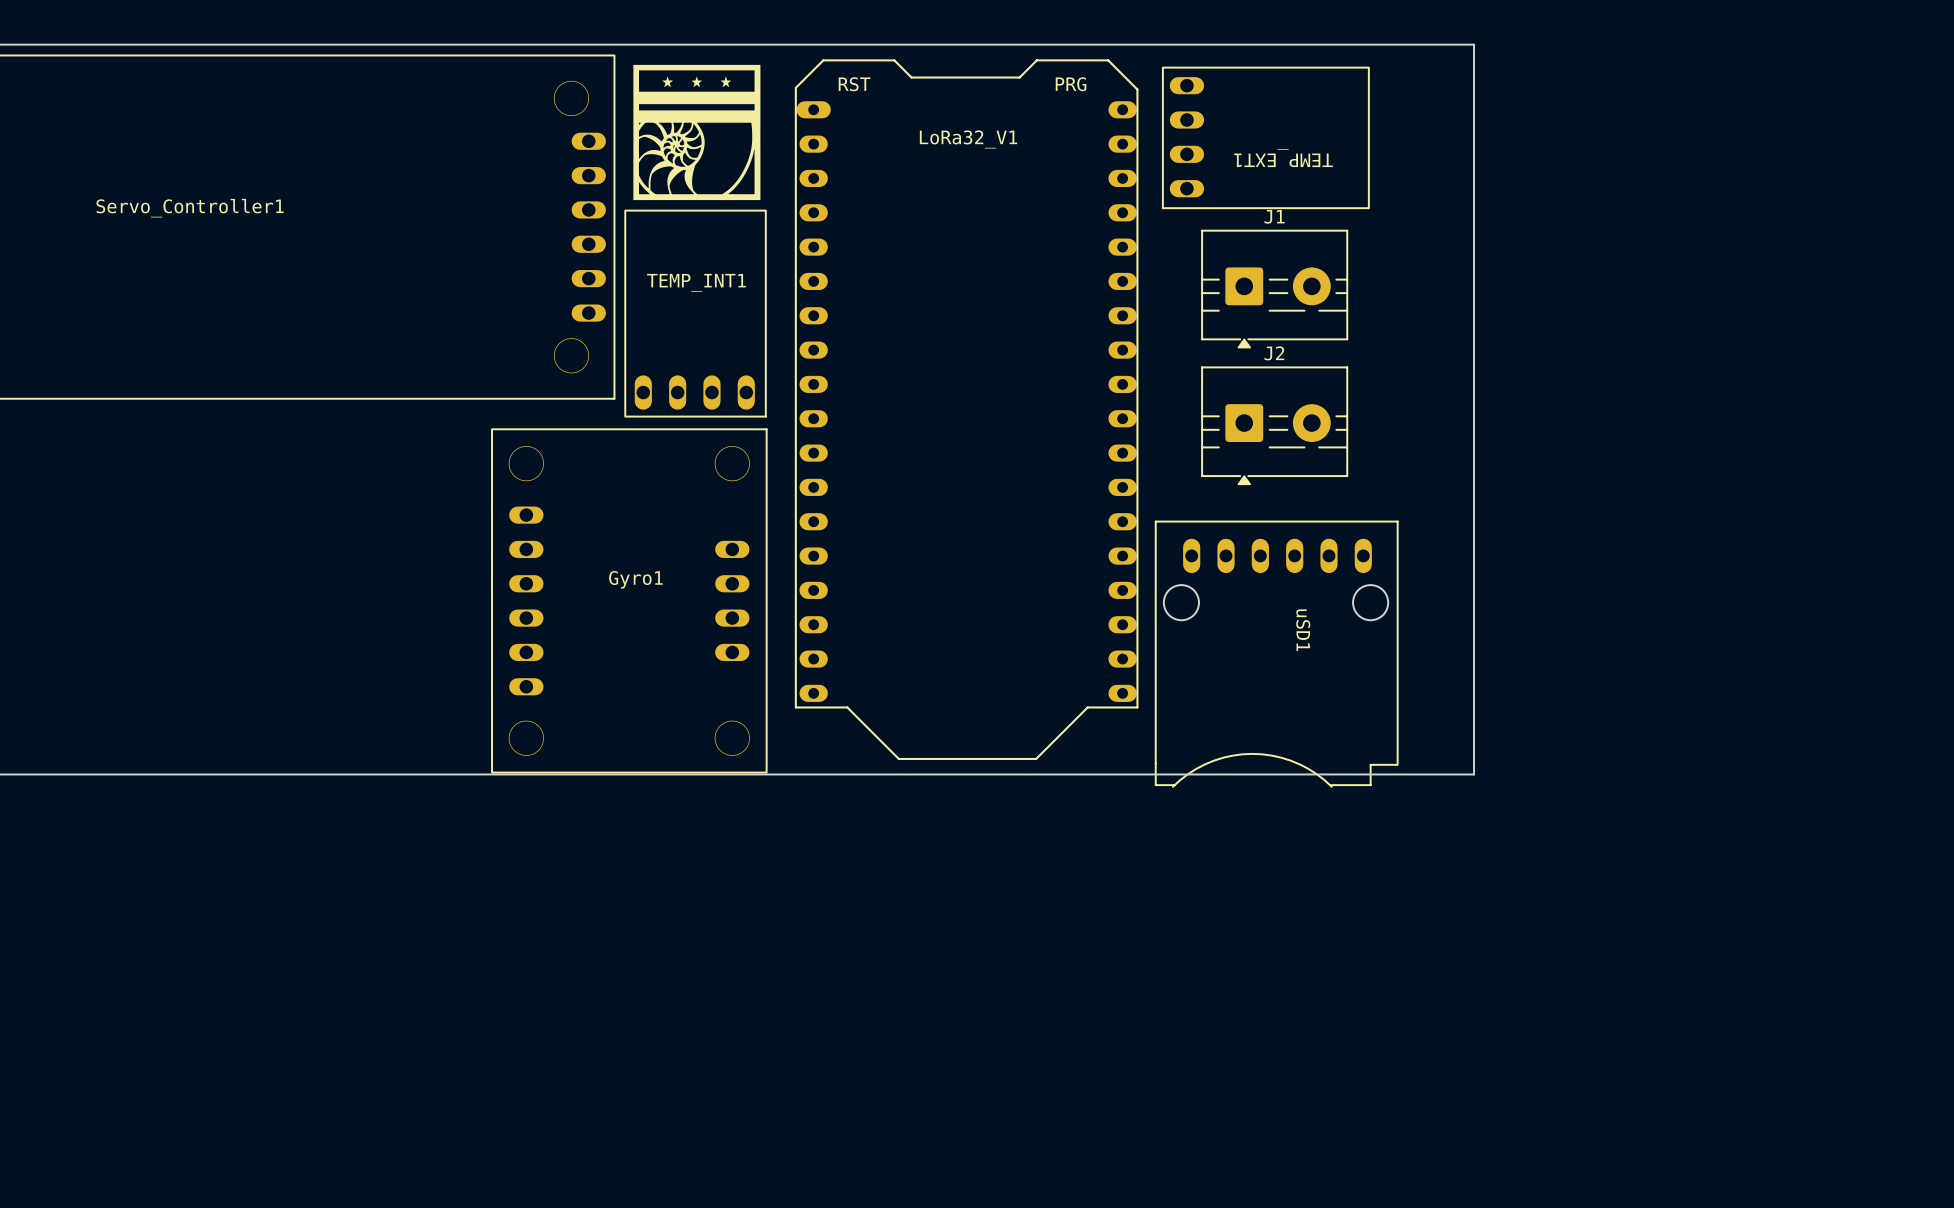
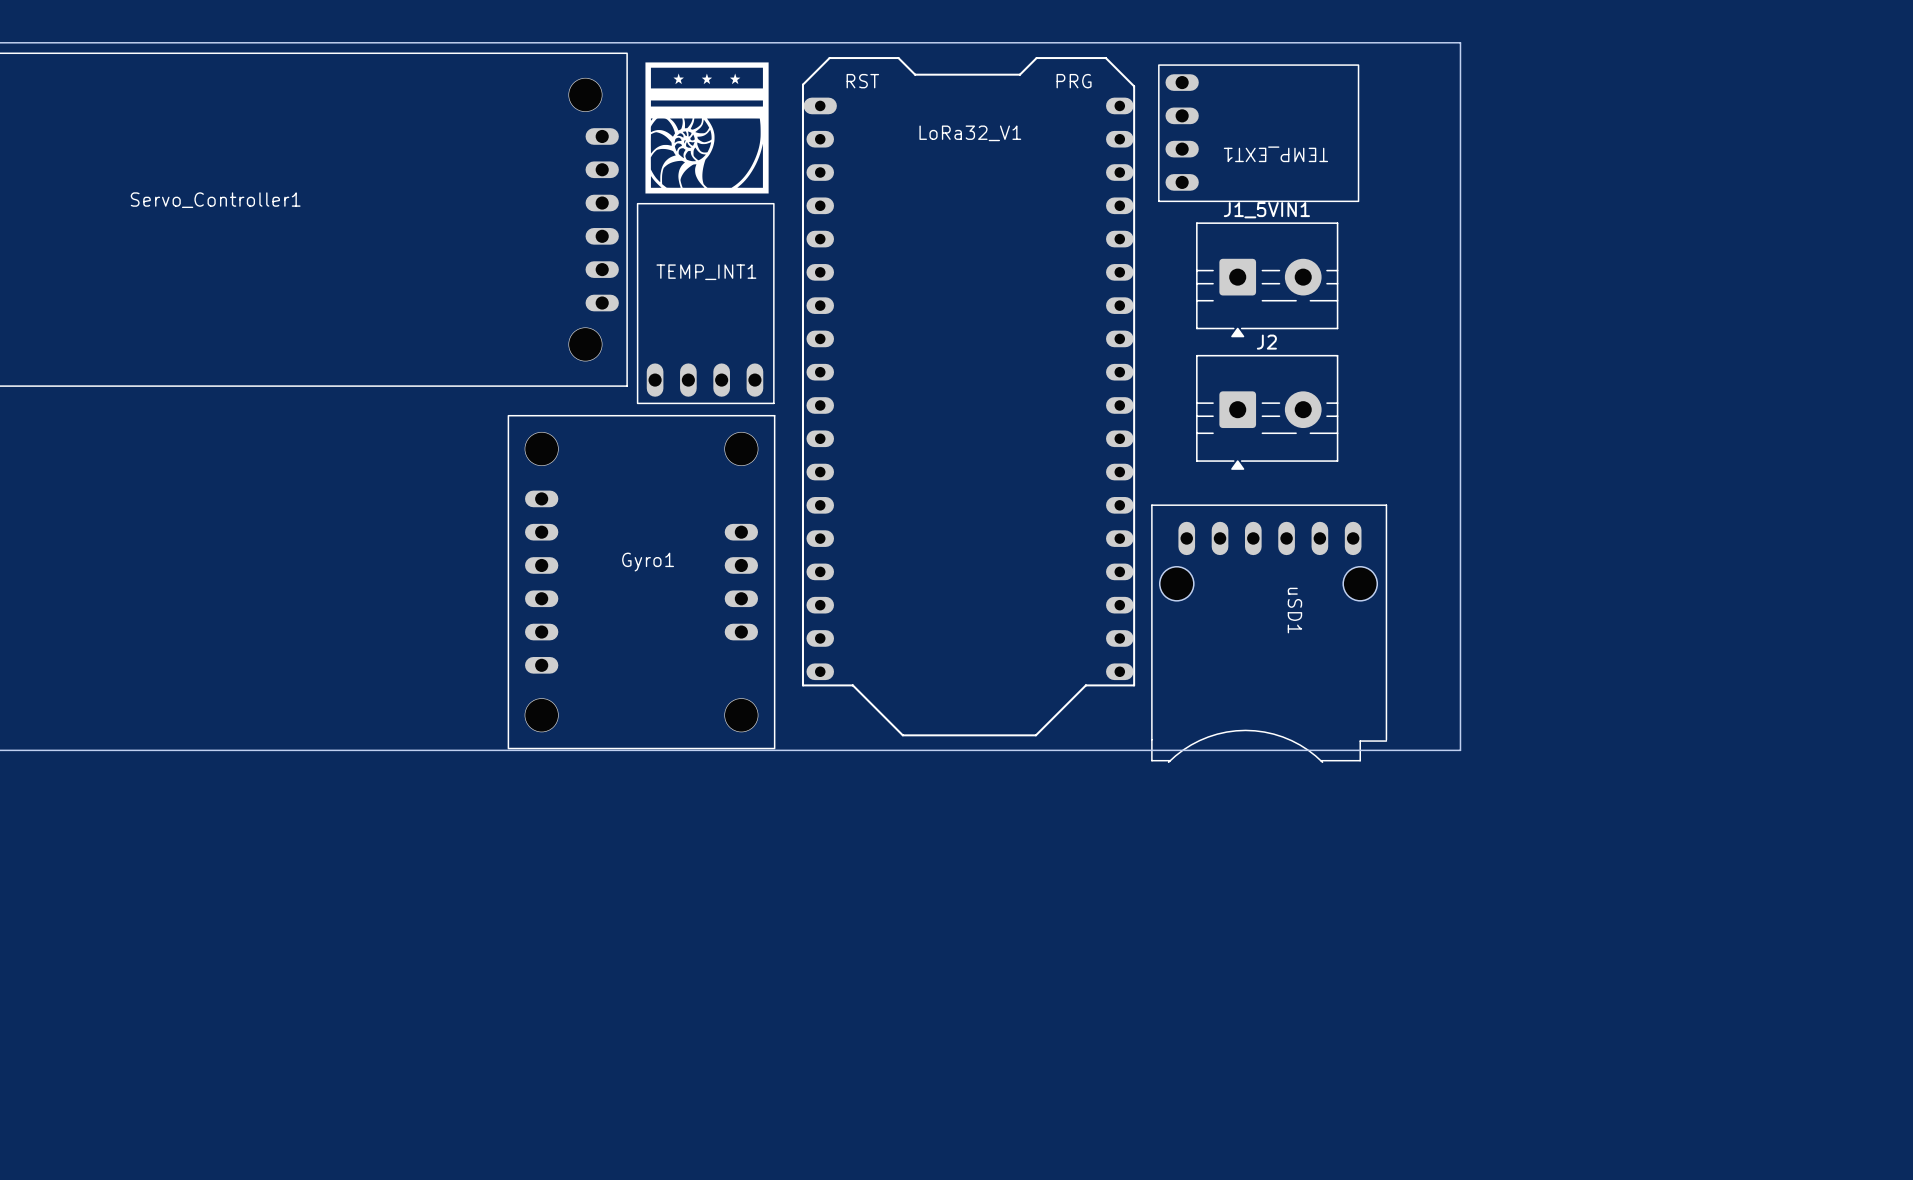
J1 name: J1 (1274, 216) -> J1_5VIN1 (1266, 210)

